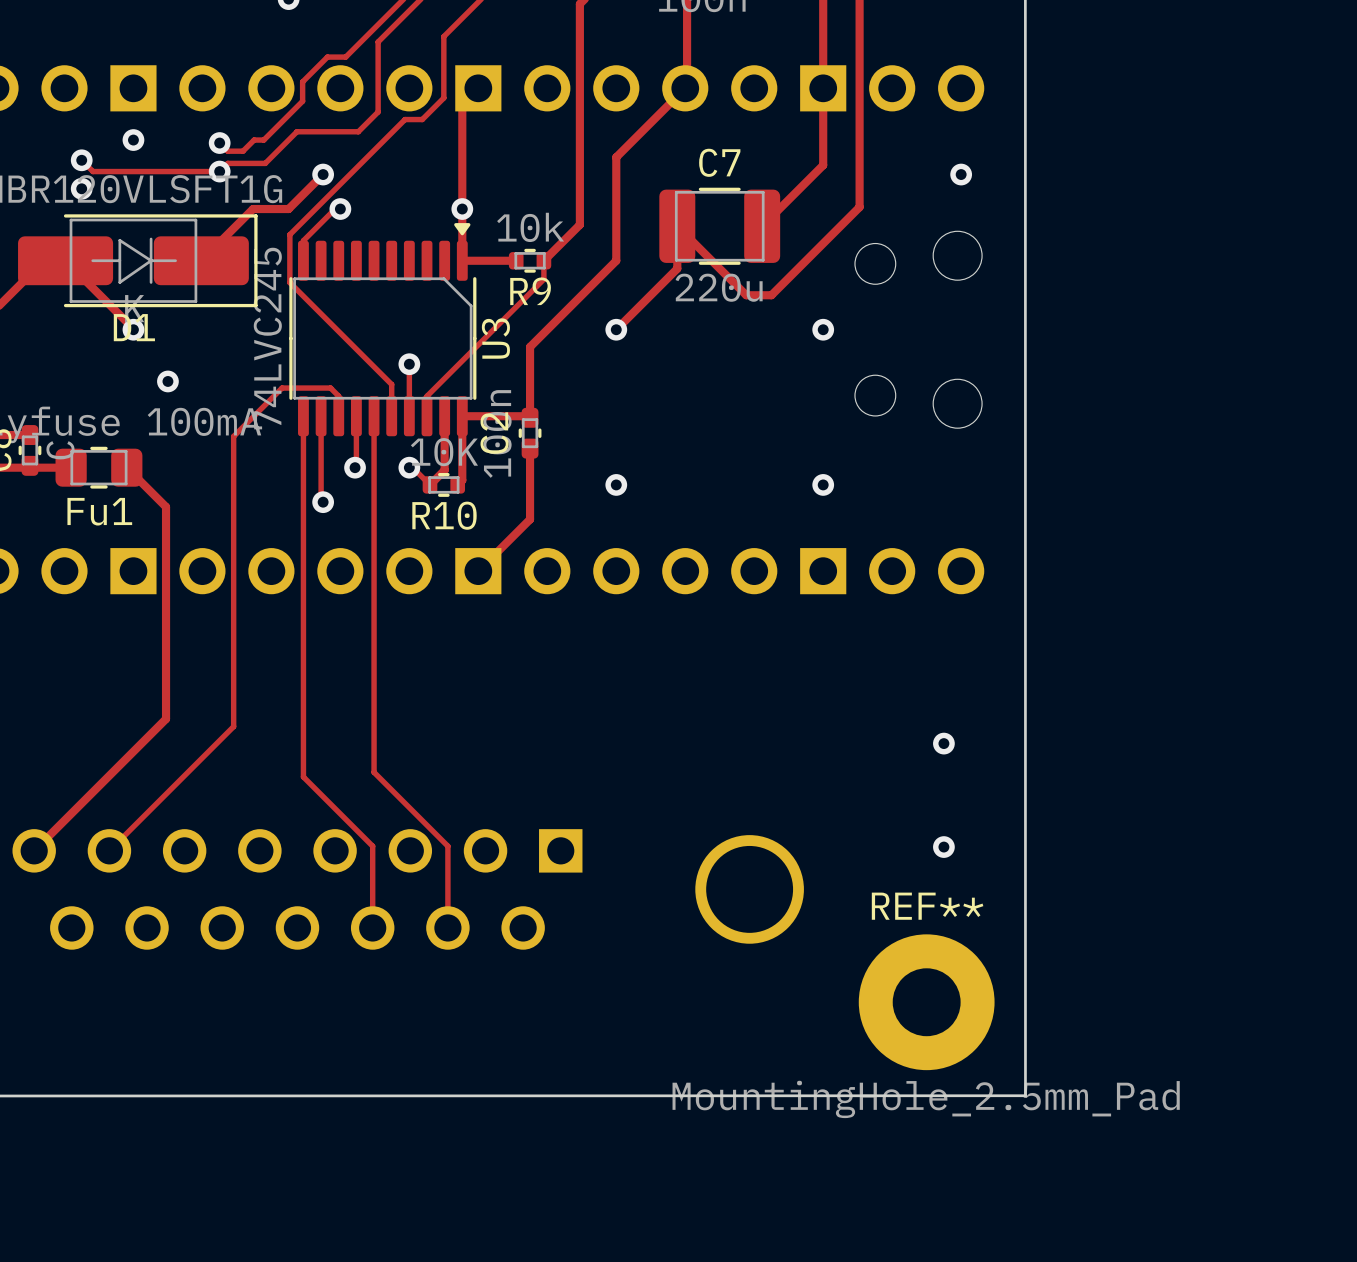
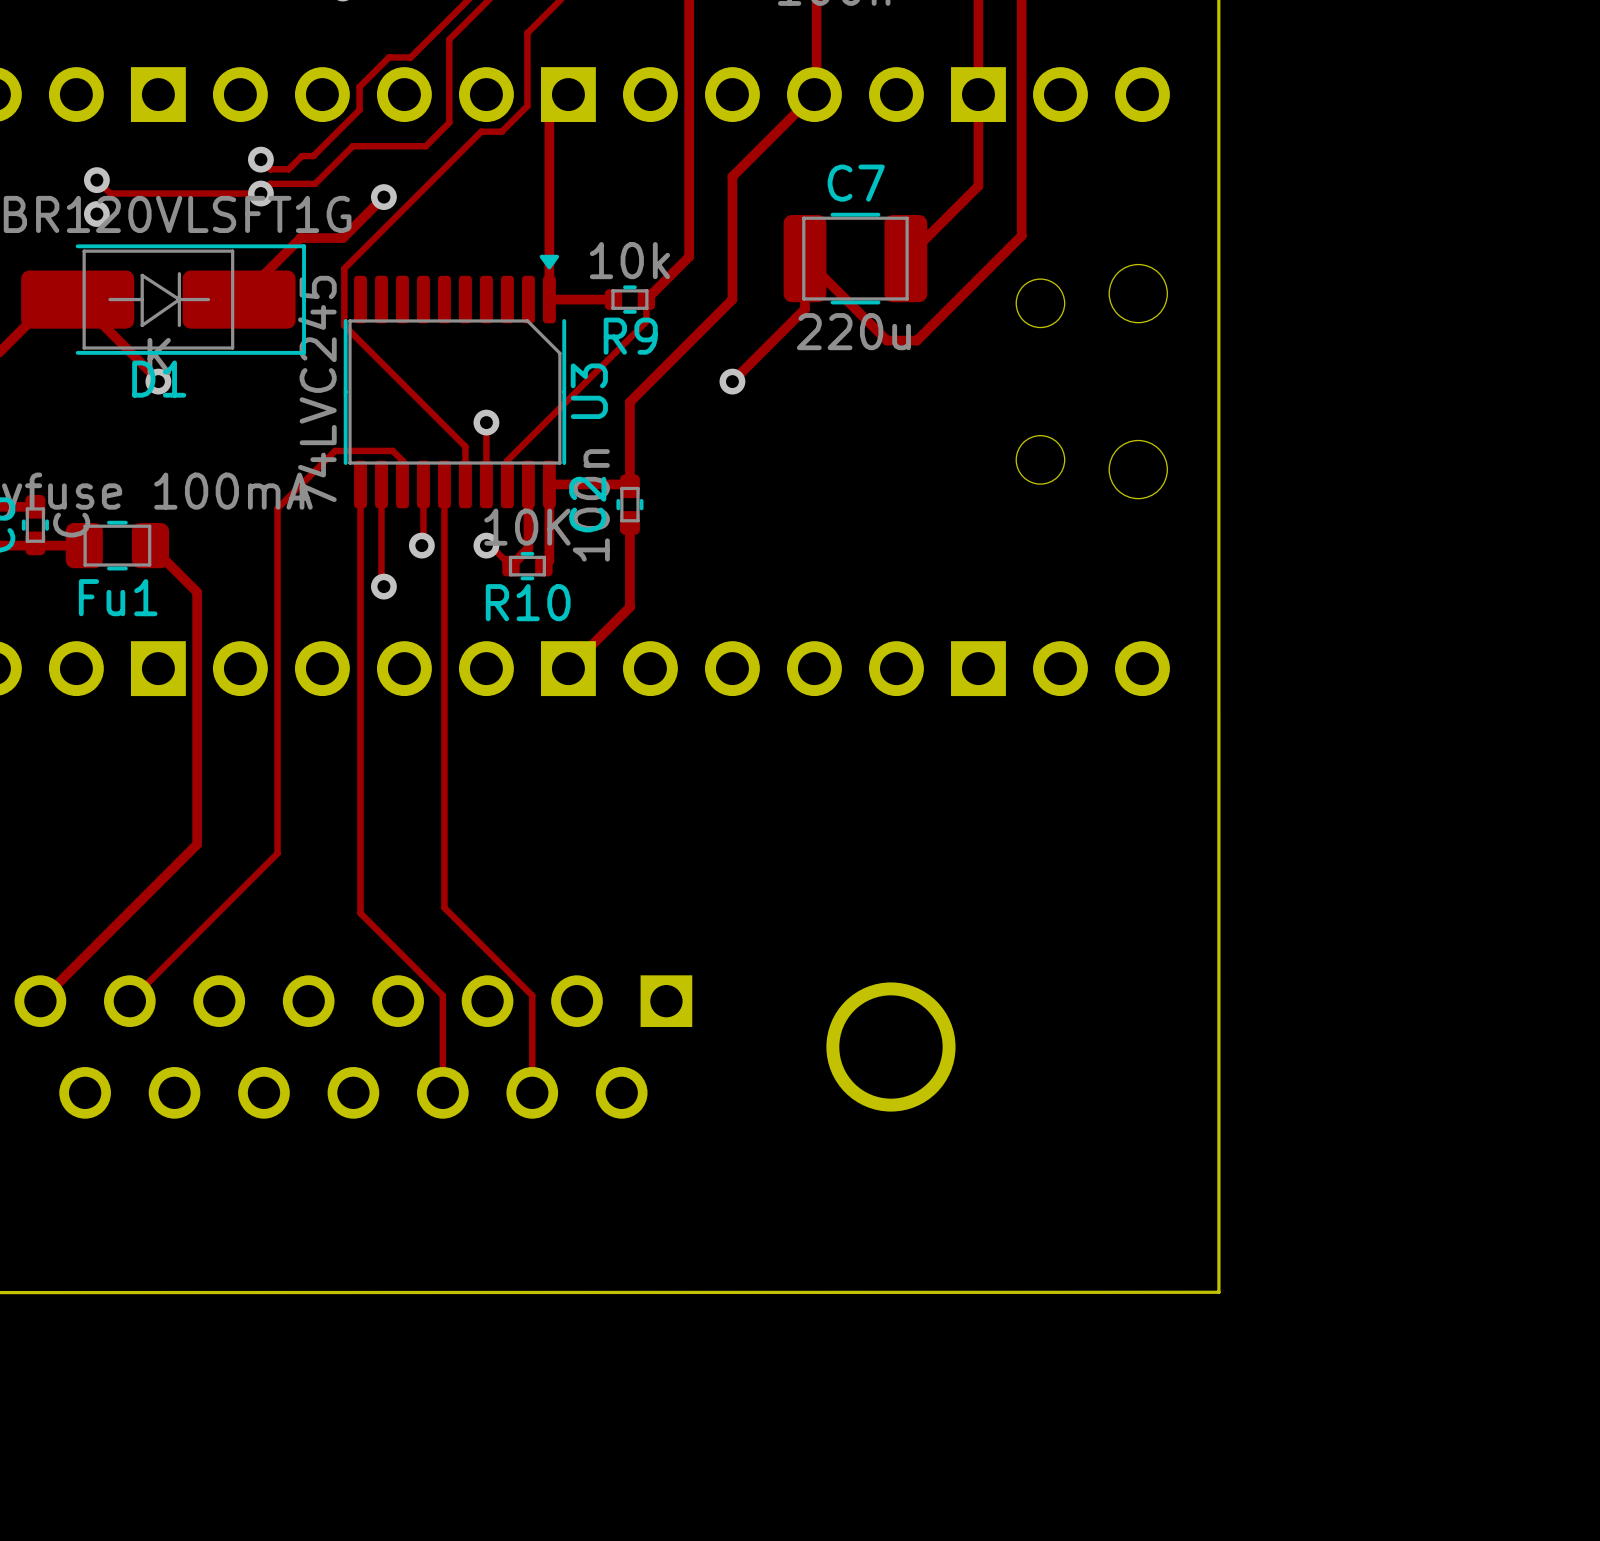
via: (133, 140) -> none
via: (961, 174) -> none
track: (340, 209) (335, 209) (303, 240) (303, 260) -> none
via: (340, 209) -> none
via: (462, 209) -> none
via: (823, 329) -> none
via: (167, 381) -> none
via: (616, 484) -> none
via: (823, 484) -> none
via: (943, 743) -> none
via: (943, 847) -> none
REF**: MountingHole_2.5mm_Pad (926, 1002) -> none

